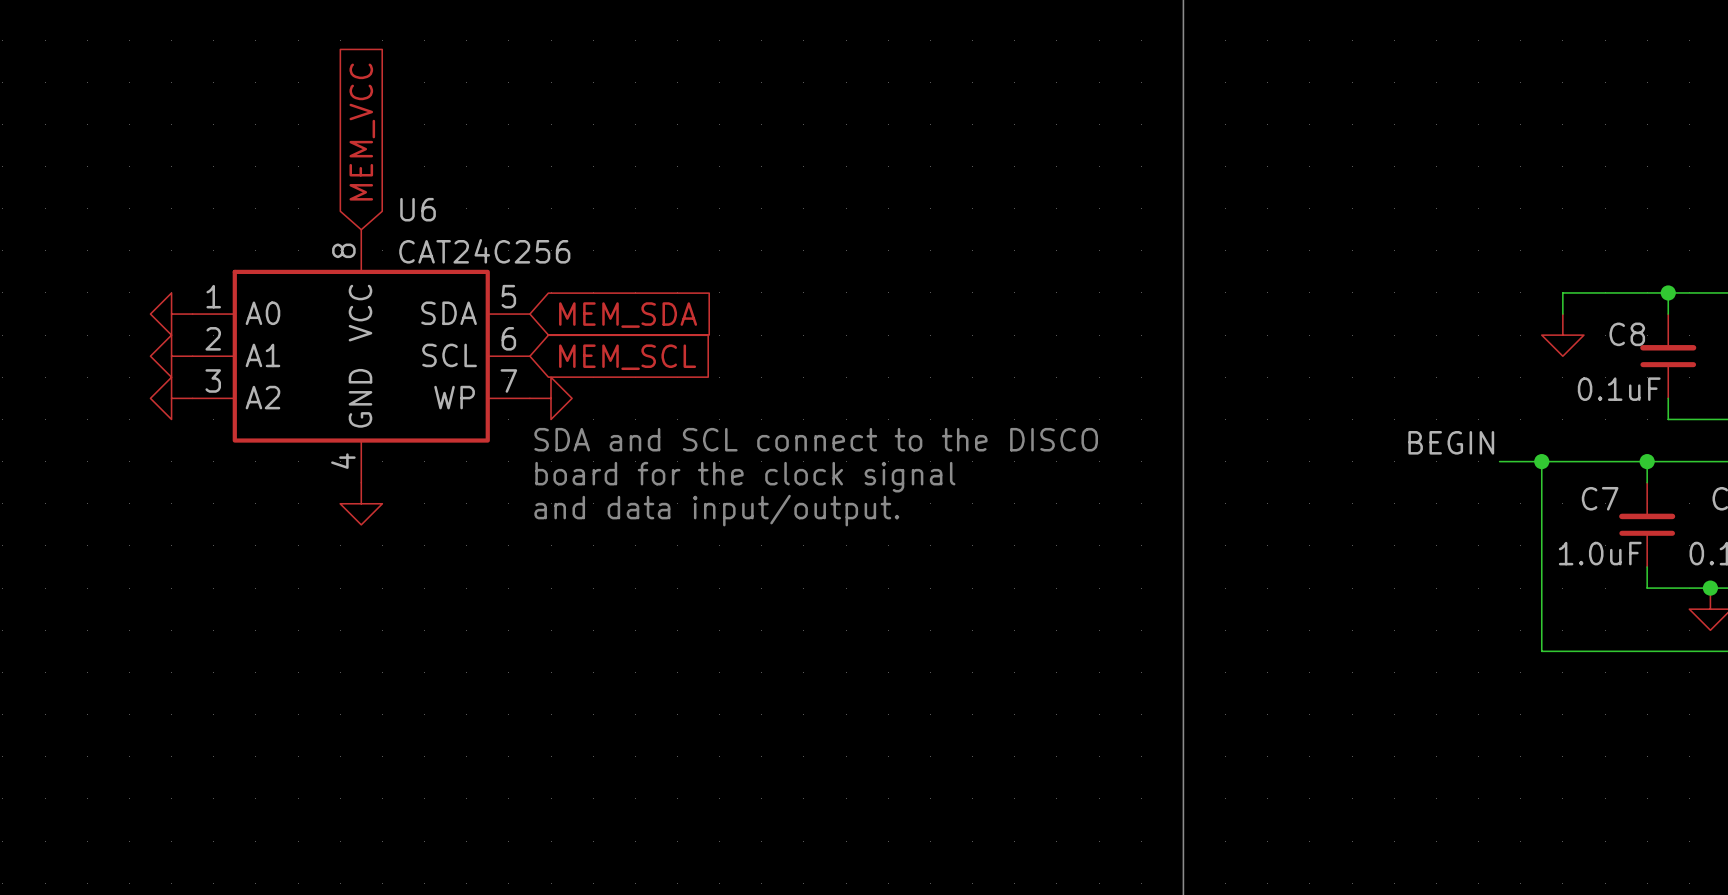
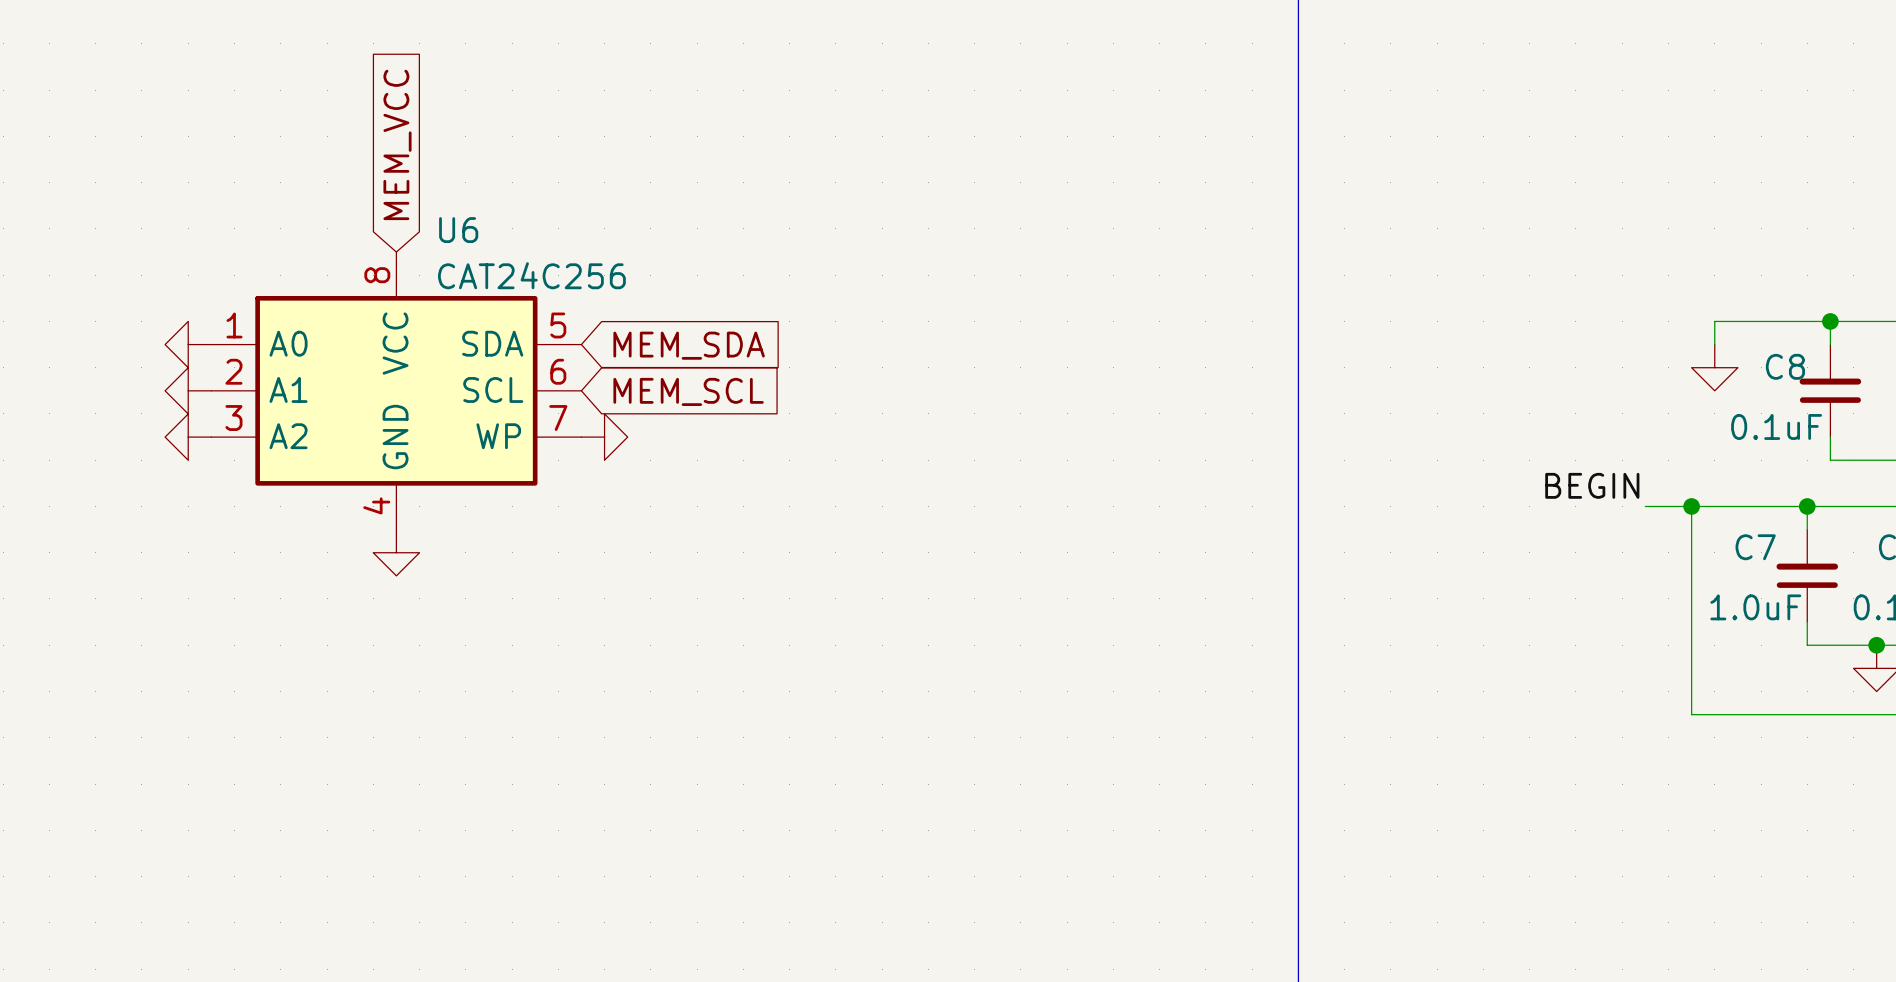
text: SDA and SCL connect to the DISCO (816, 439) -> none
text: board for the clock signal (745, 477) -> none
text: and data input/output. (716, 510) -> none

